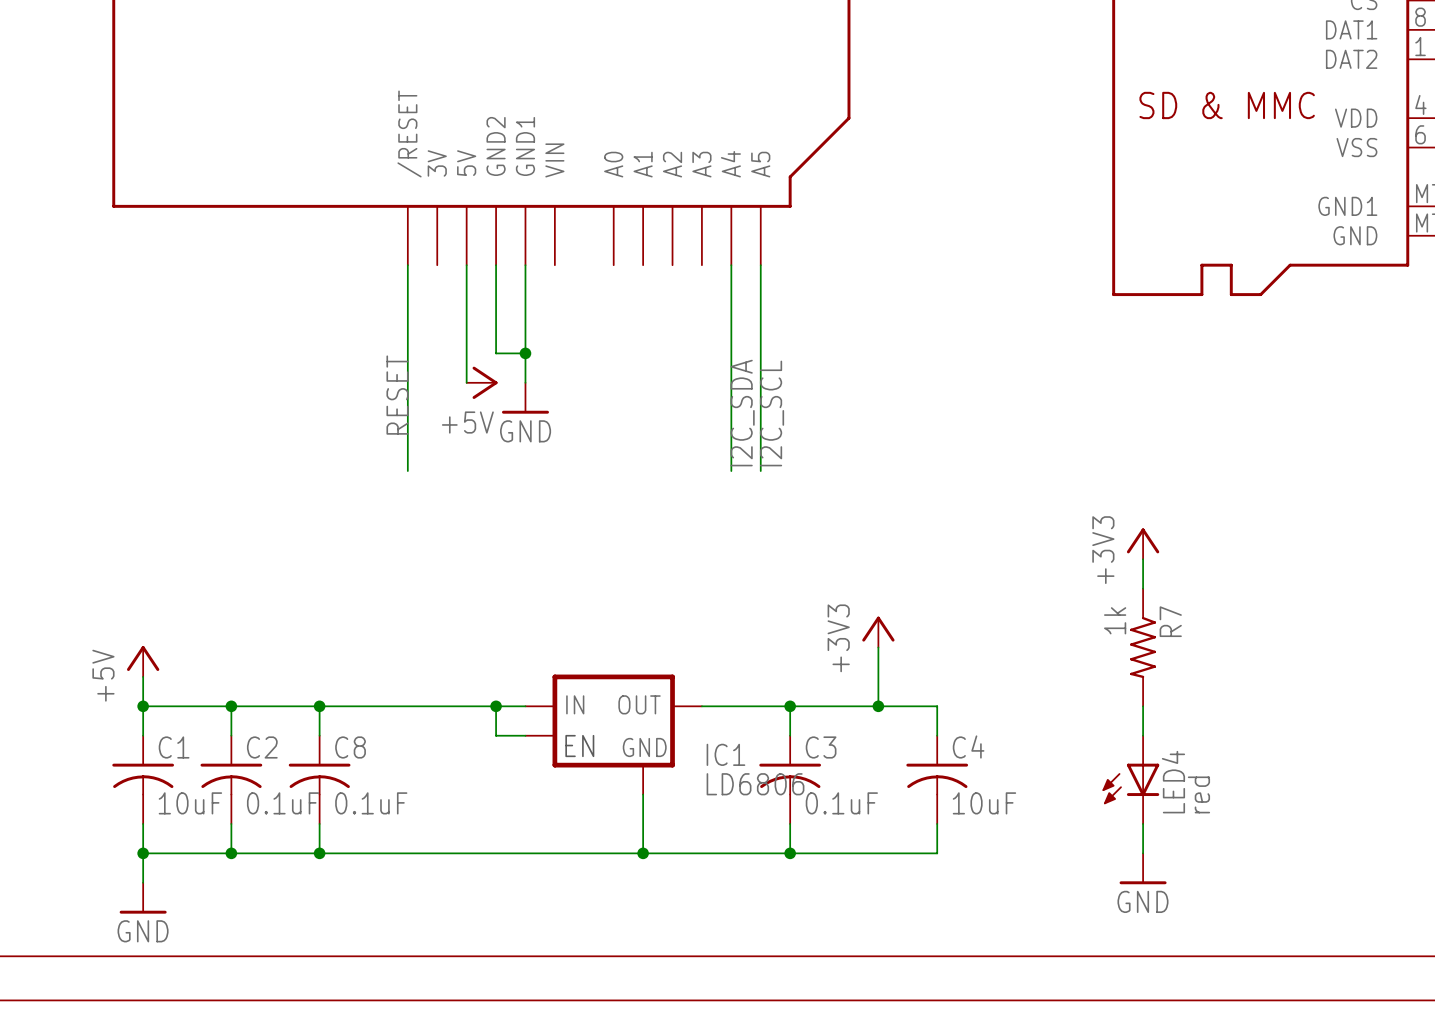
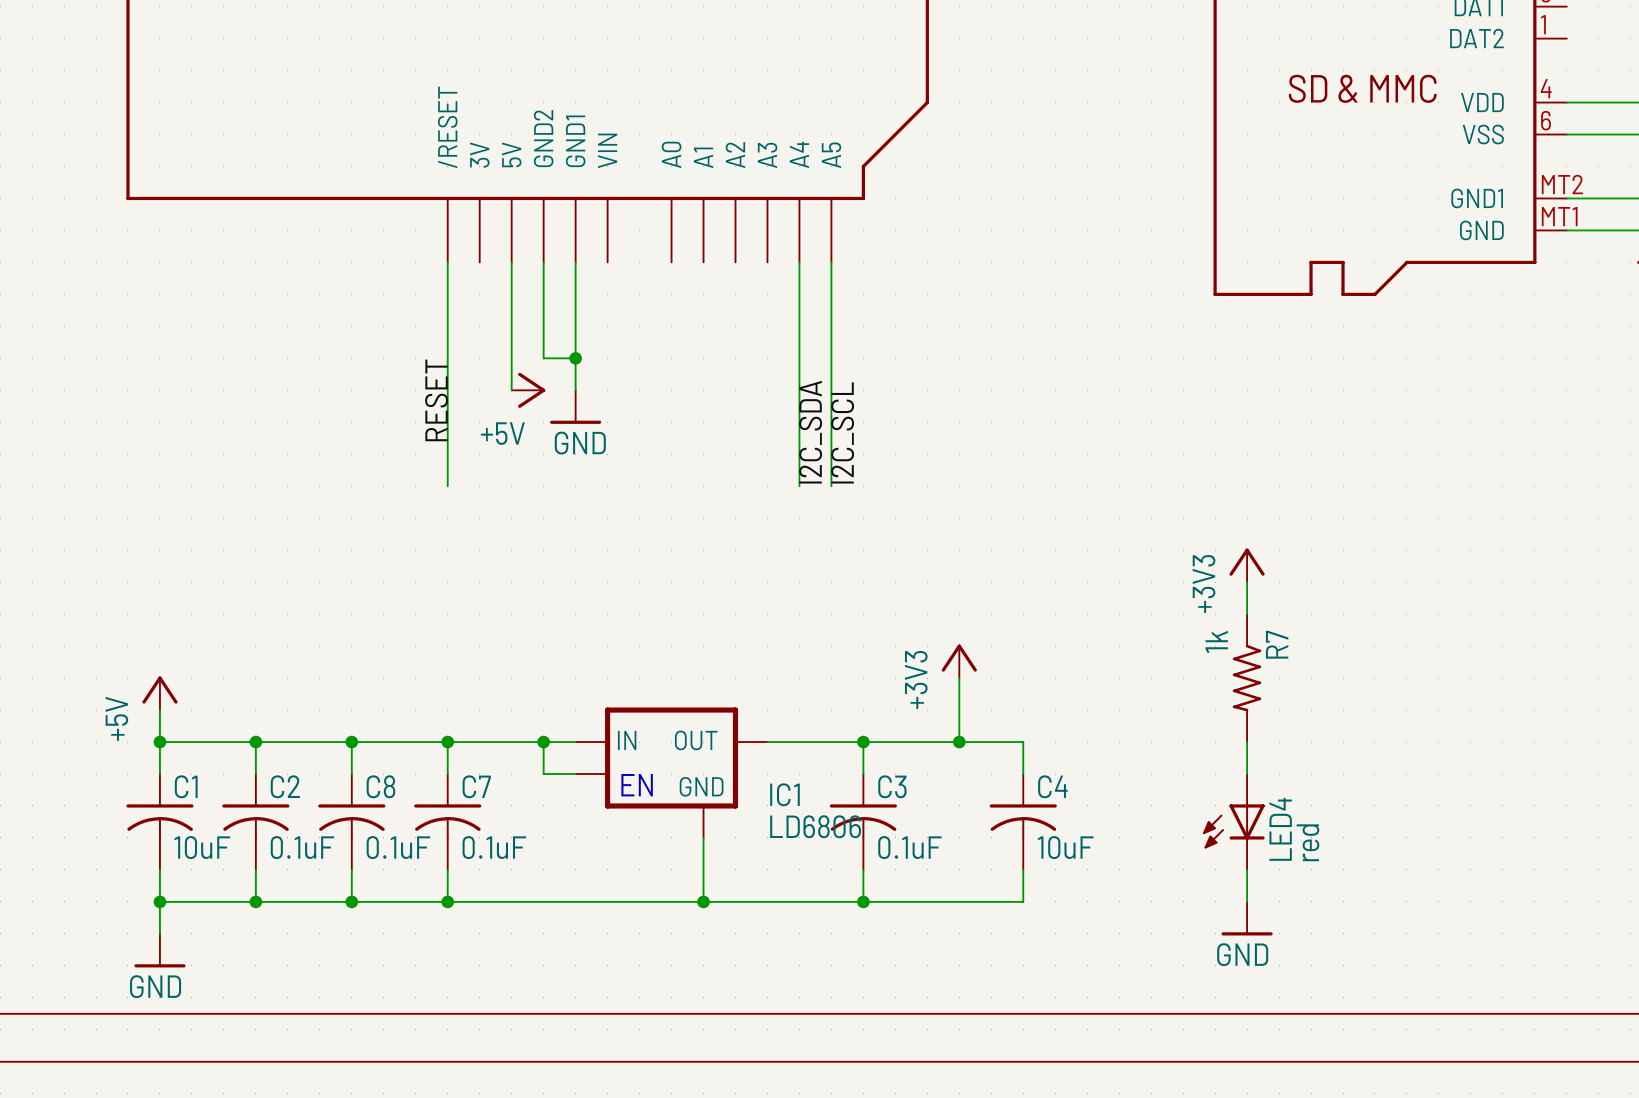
wire: none -> (447, 742) (447, 774)
junction: none -> (447, 742)
C7: none -> 0.1uF (447, 821)
wire: none -> (447, 869) (447, 901)
junction: none -> (447, 901)

